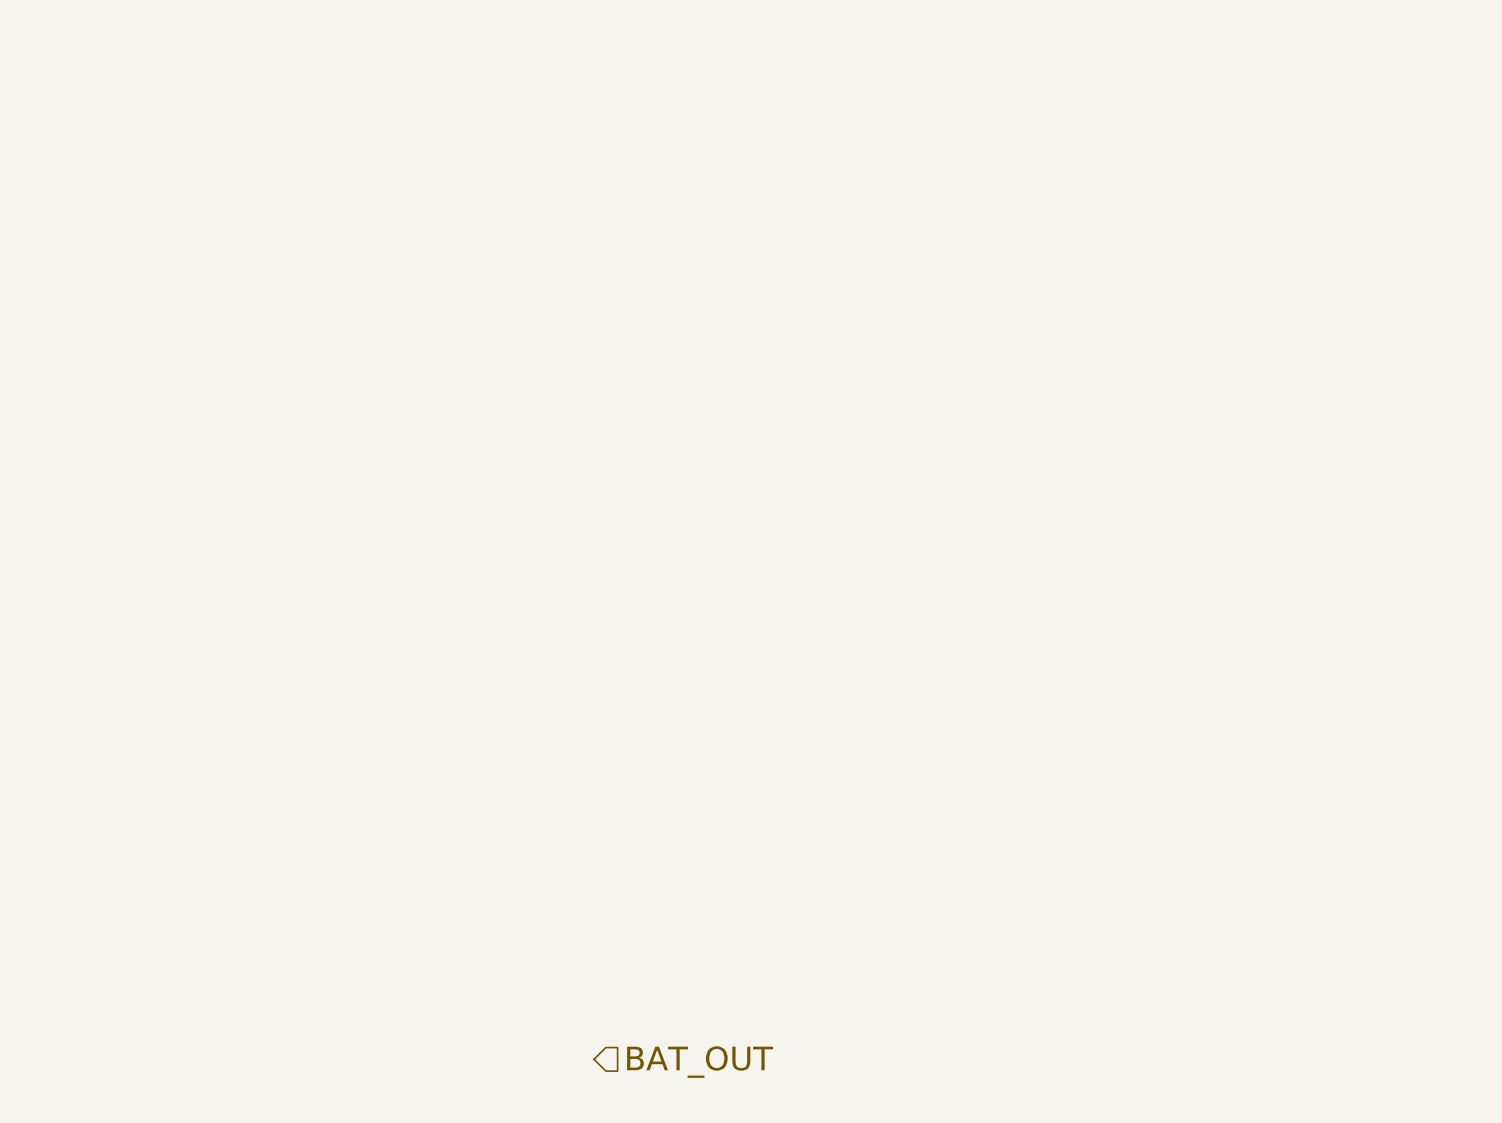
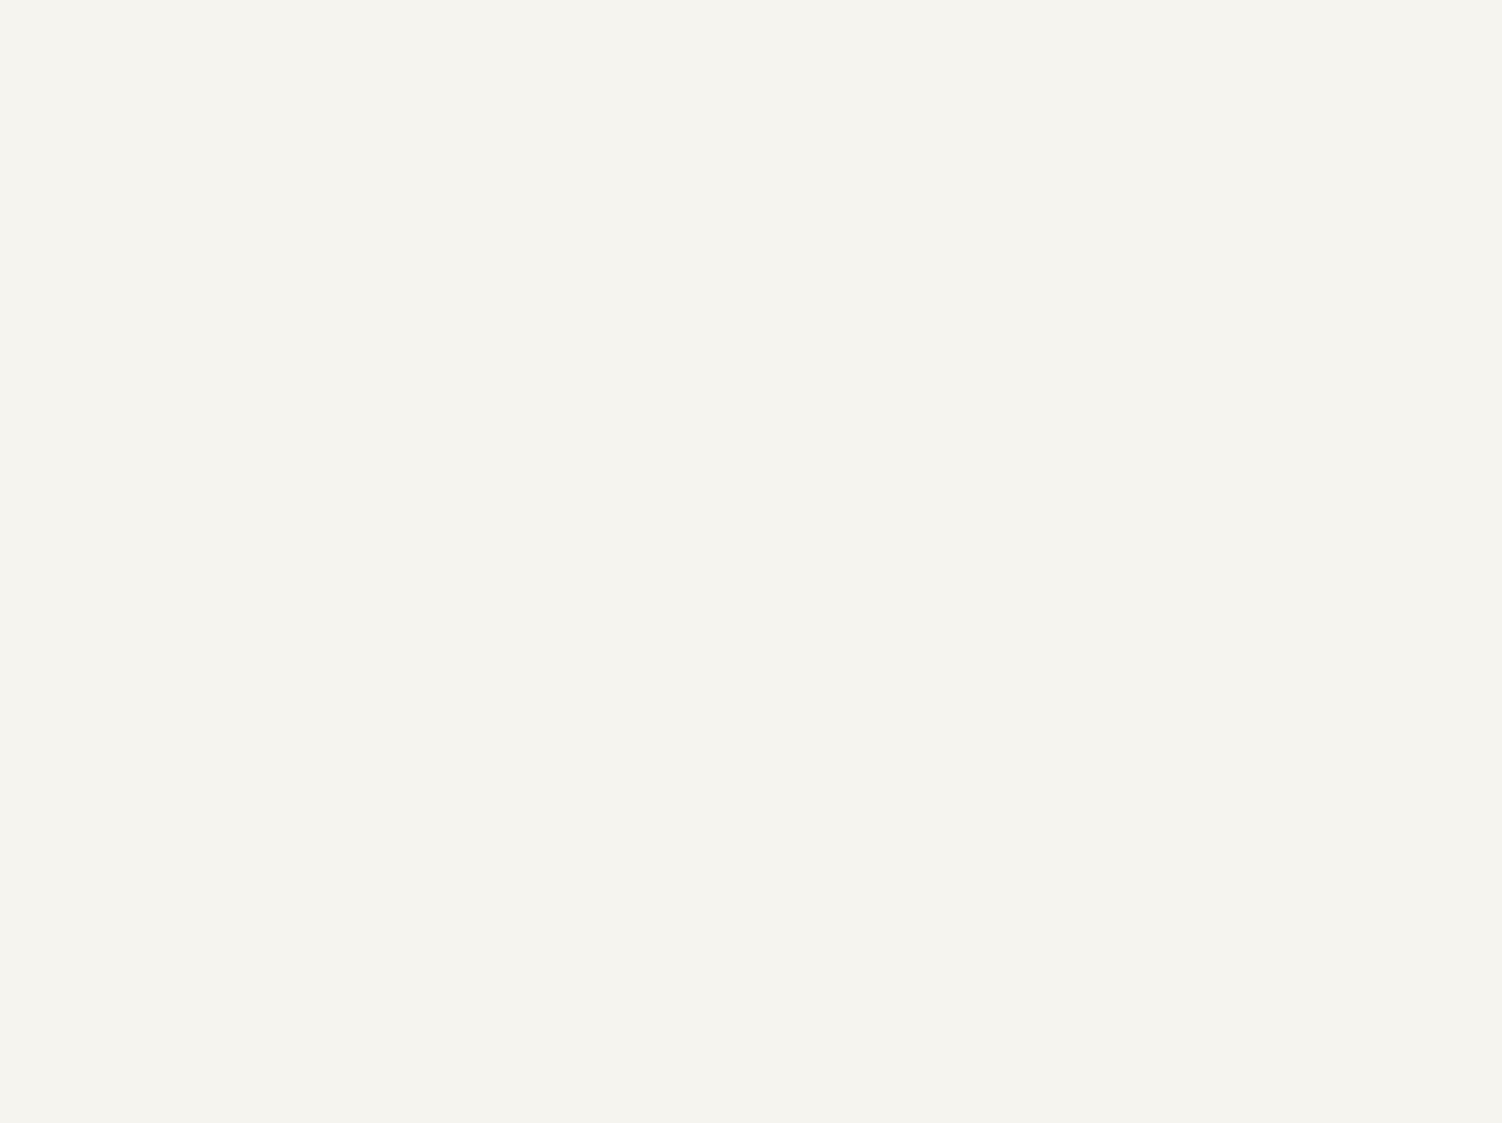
hierarchical label: BAT_OUT (700, 1062) -> none

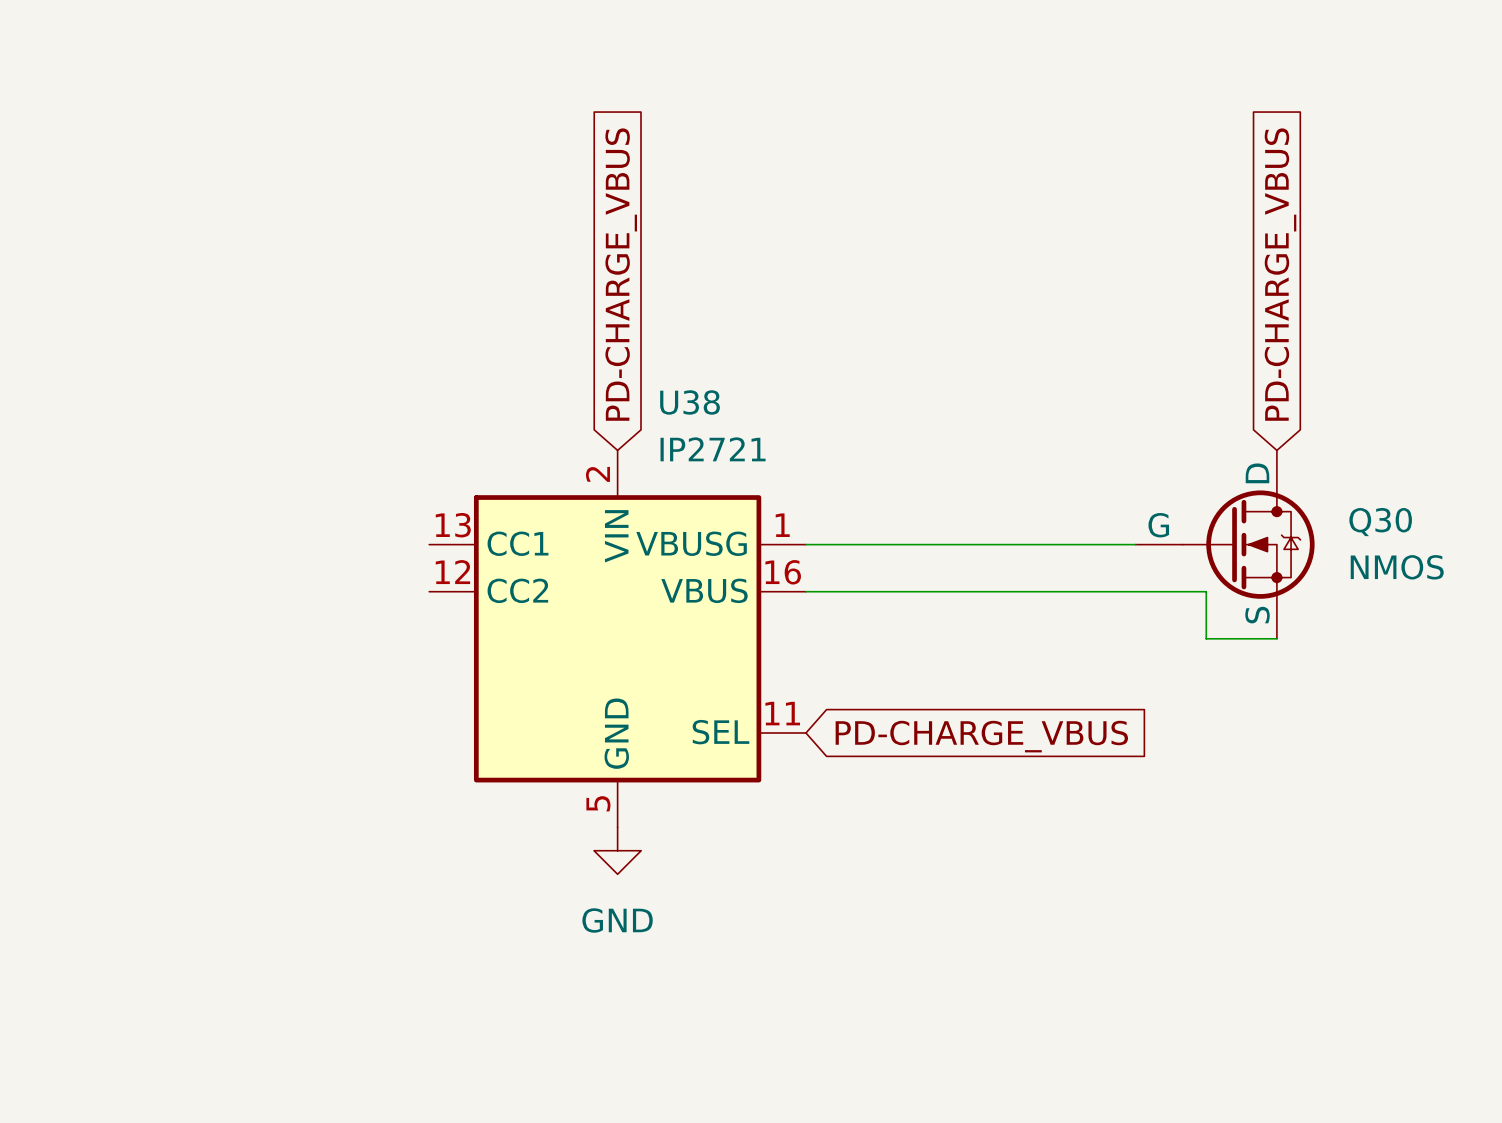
global label: none -> PD-CHARGE_VBUS (621, 274)
global label: none -> PD-CHARGE_VBUS (1280, 274)
wire: none -> (805, 544) (1135, 544)
Q30: none -> NMOS (1225, 544)
wire: none -> (805, 591) (1206, 591) (1206, 638) (1276, 638)
U38: none -> IP2721 (617, 638)
global label: none -> PD-CHARGE_VBUS (981, 736)
power symbol: none -> GND (617, 850)

